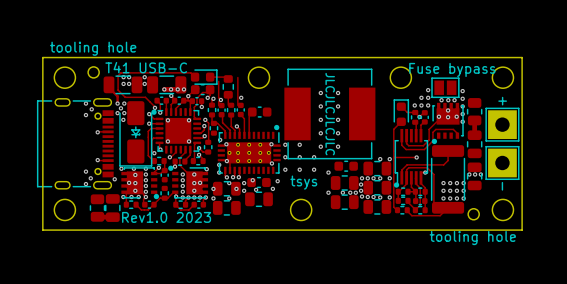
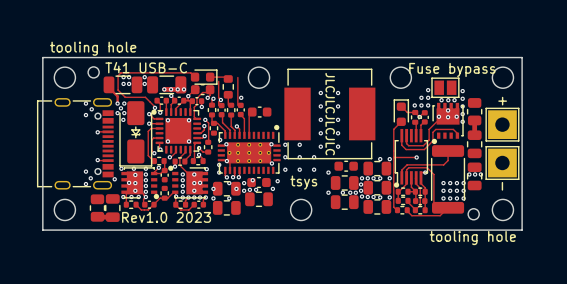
via: none -> (249, 189)

